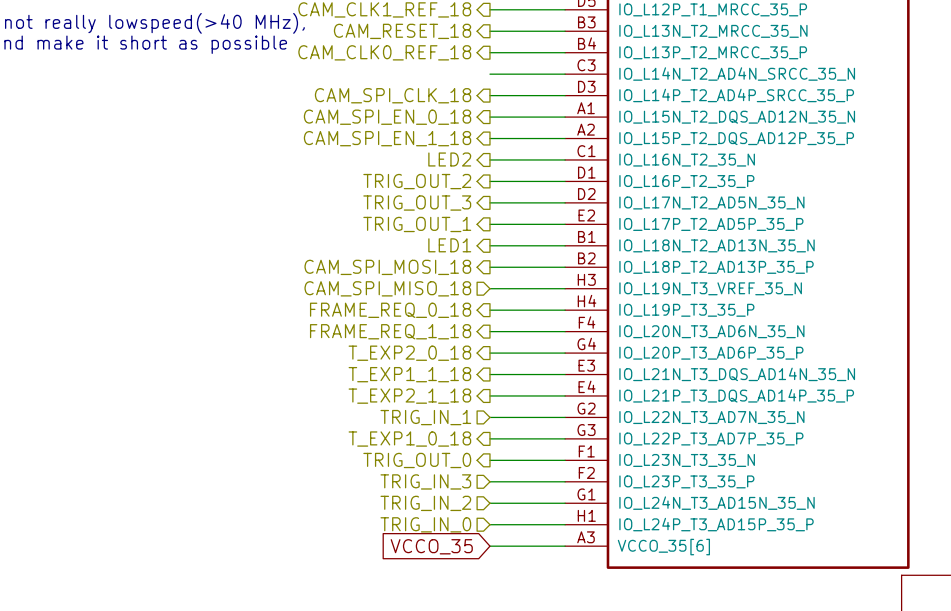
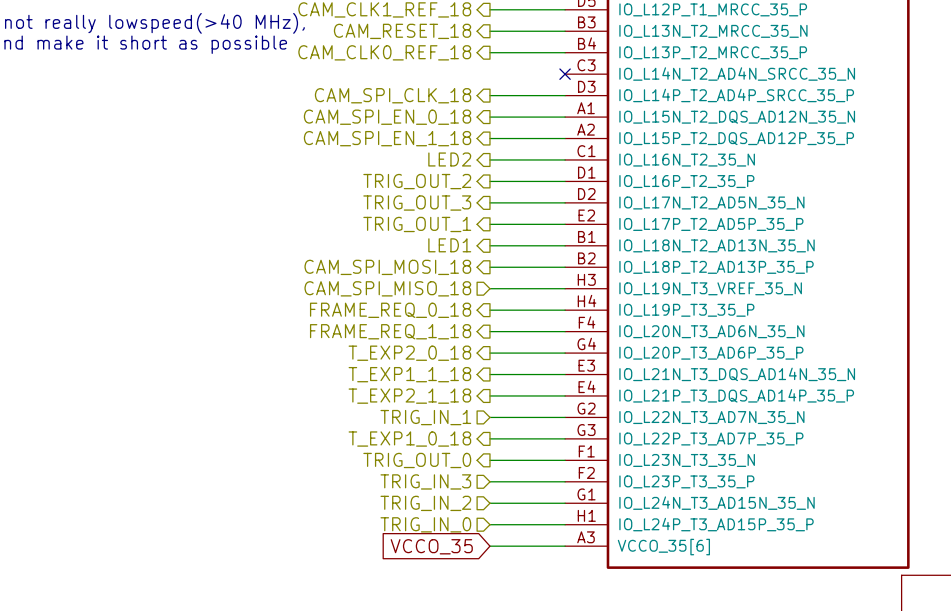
wire: (489, 74) (565, 74) -> none
no-connect mark: none -> (565, 74)

